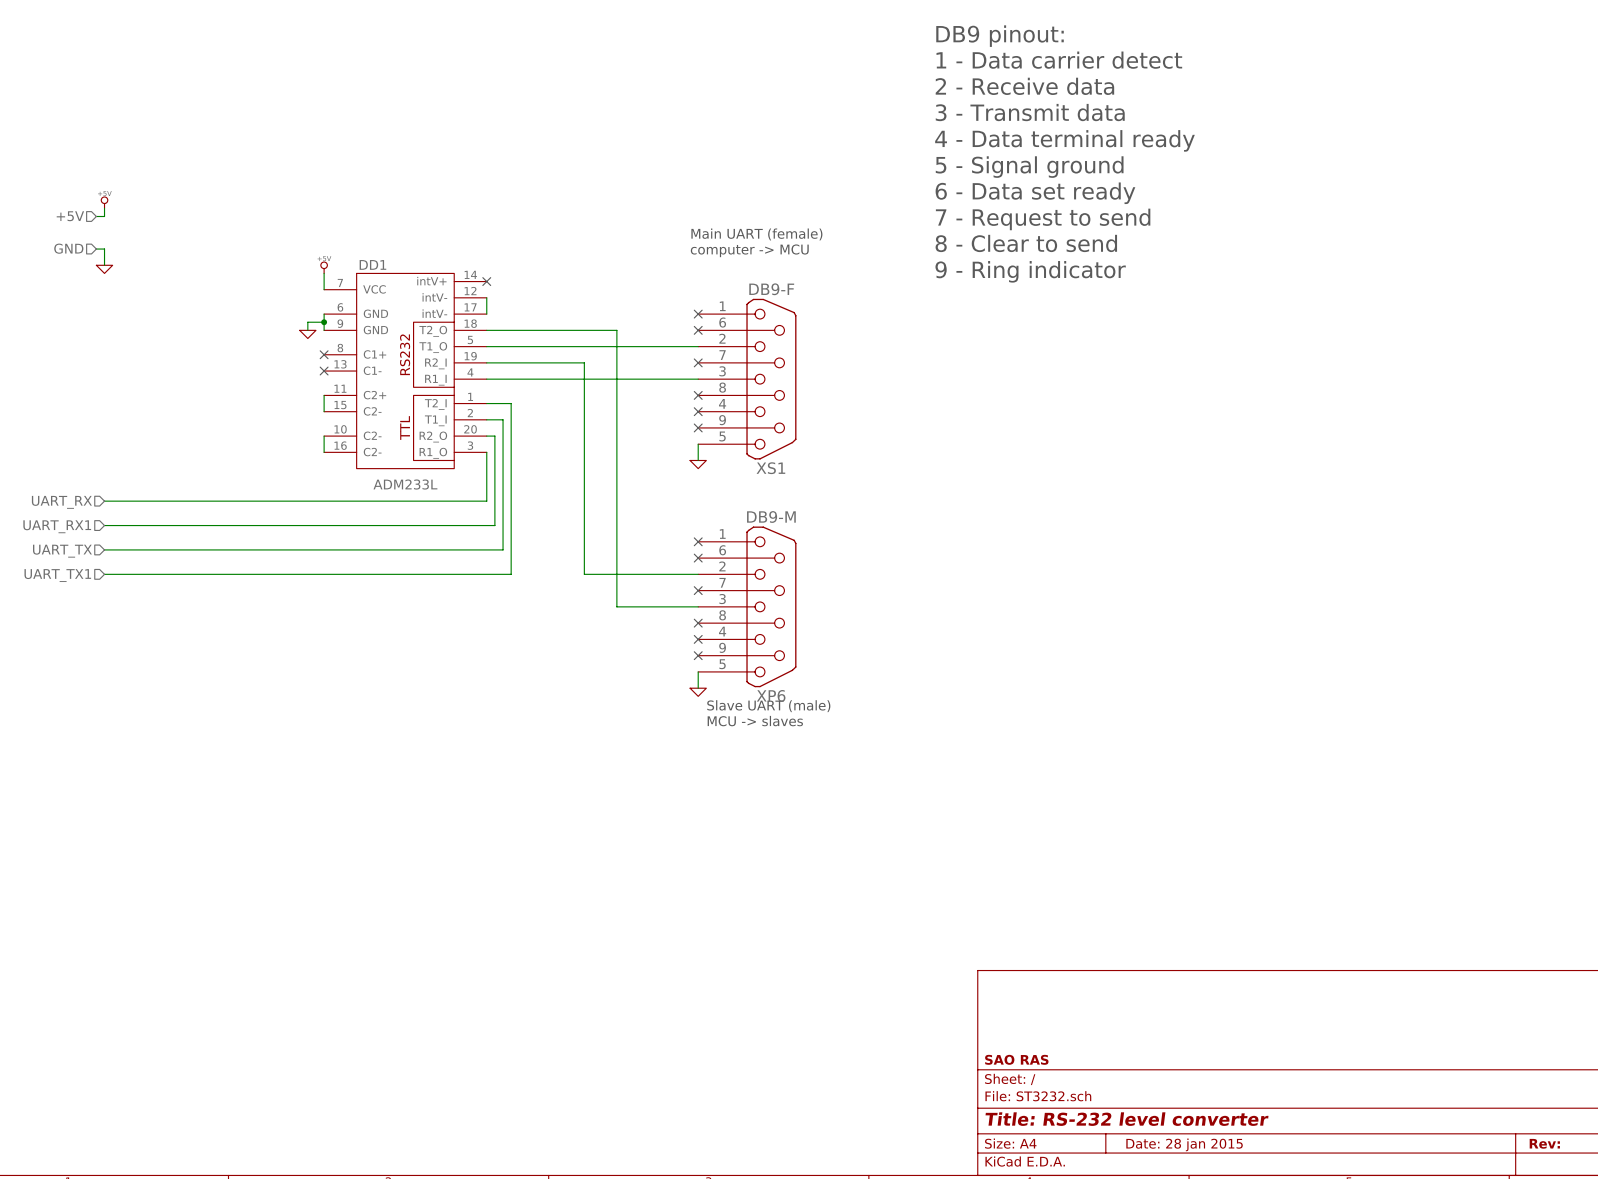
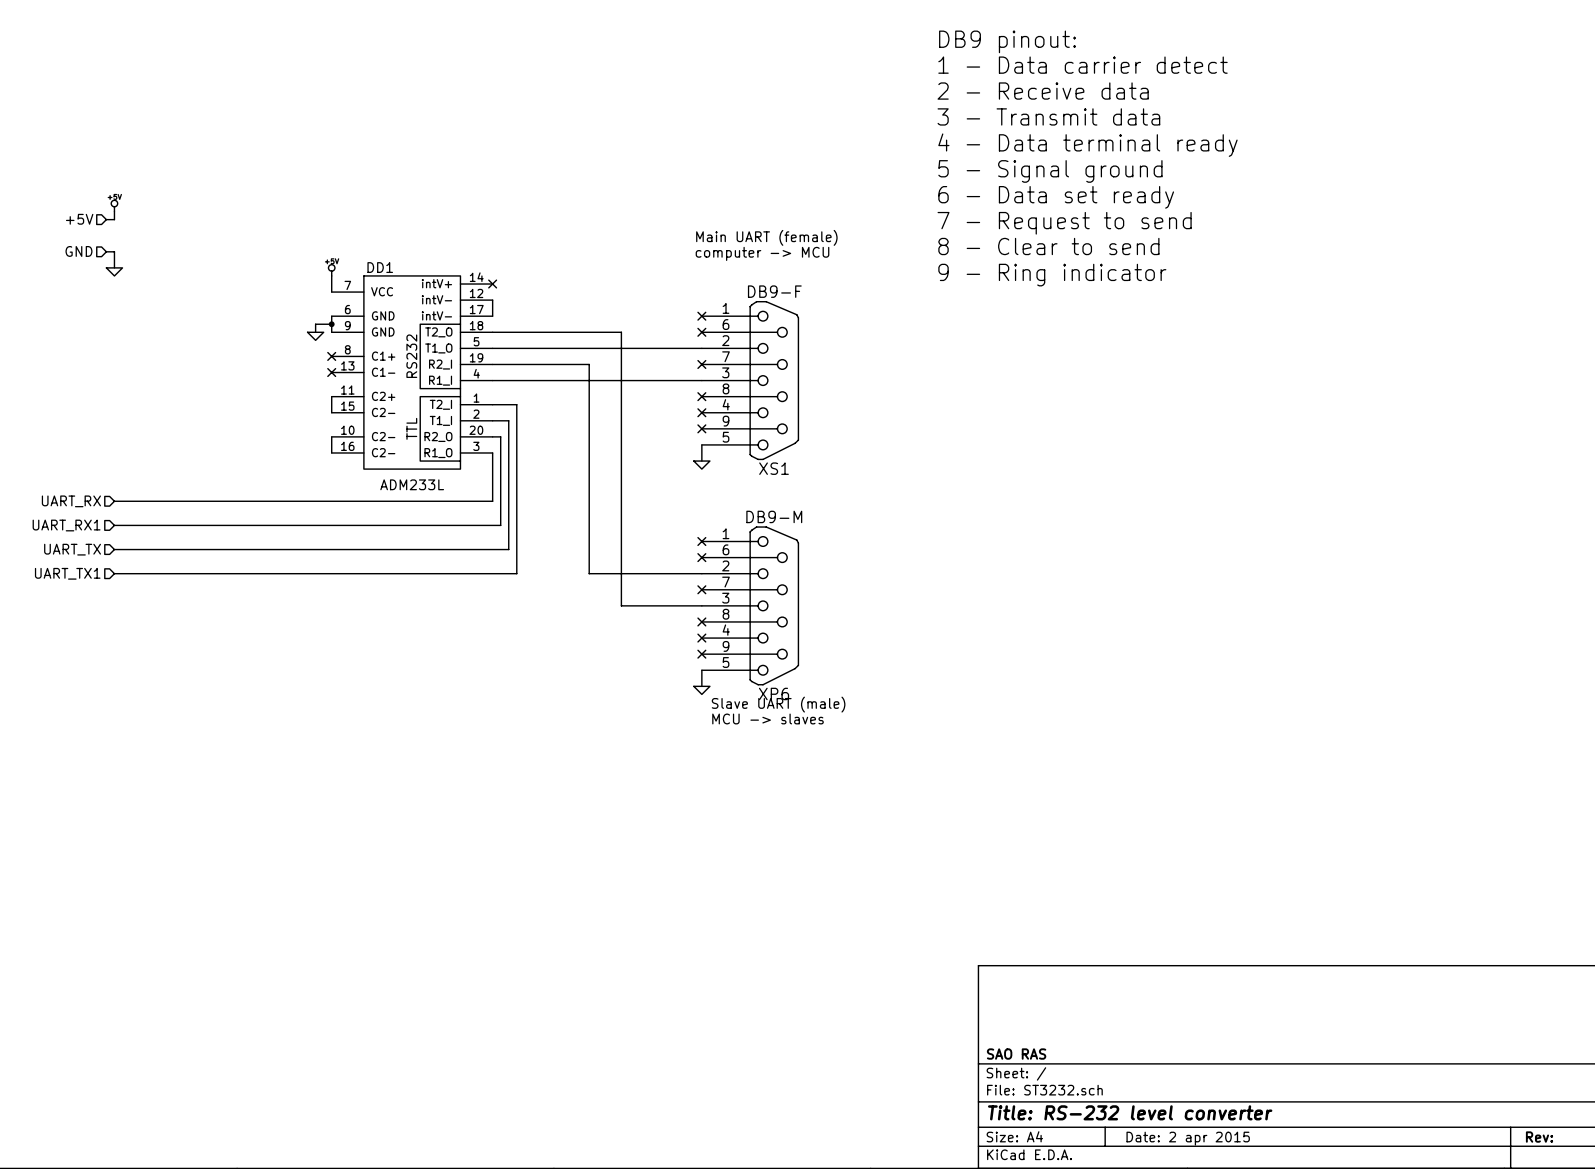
title block: Date: 28 jan 2015 (1184, 1144) -> Date: 2 apr 2015 (1188, 1138)

